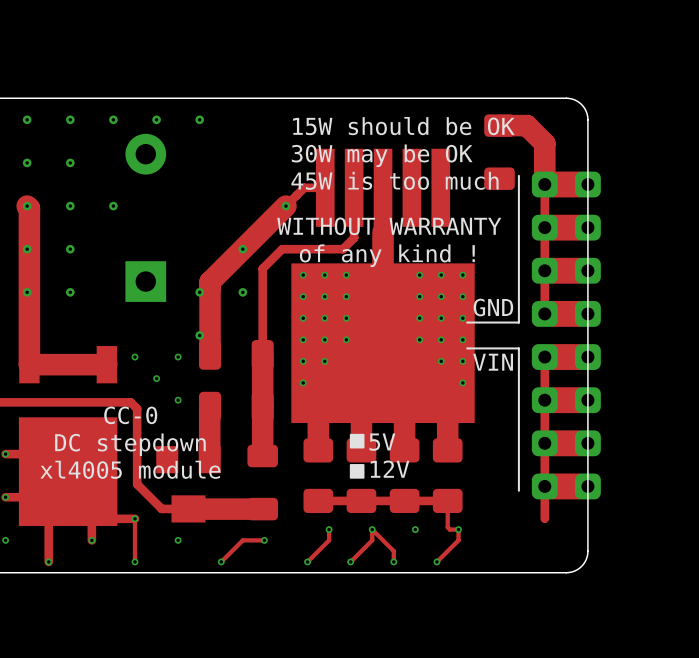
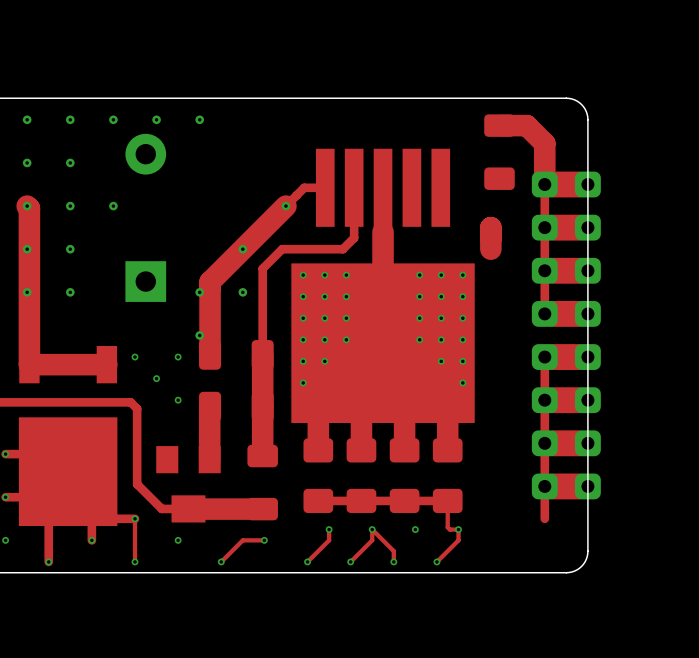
text: 15W should be OK (403, 126) -> none
text: 30W may be OK (382, 155) -> none
line: (518, 175) (518, 322) (467, 322) -> none
text: 45W is too much (395, 180) -> none
text: WITHOUT WARRANTY (389, 226) -> none
top track: none -> (490, 227) (490, 249)
text: of any kind ! (387, 255) -> none
text: GND (493, 307) -> none
line: (467, 348) (518, 348) (518, 490) -> none
text: VIN (493, 362) -> none
text: CC-0 (130, 415) -> none
drawing: [349, 433, 365, 479] -> none
text: 5V (382, 442) -> none
text: DC stepdown (130, 444) -> none
text: xl4005 module (130, 469) -> none
text: 12V (390, 469) -> none

